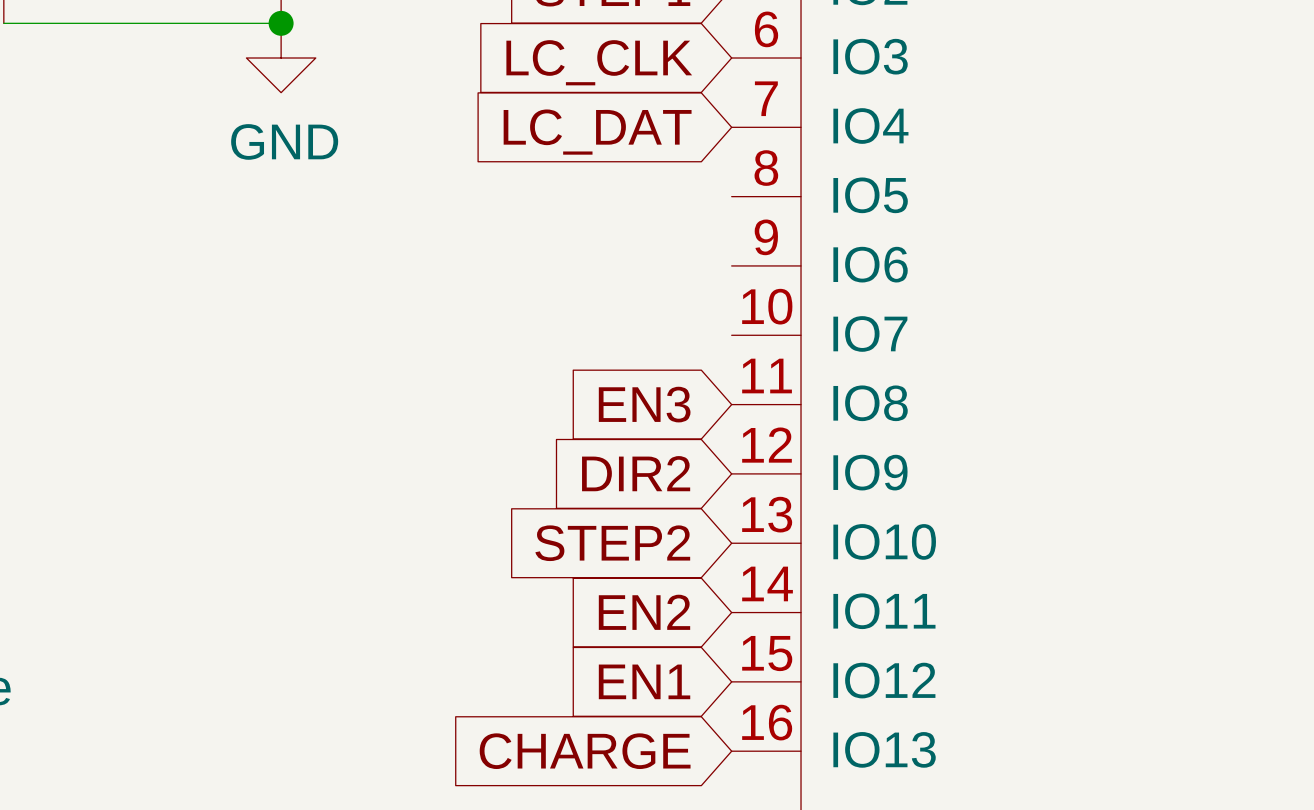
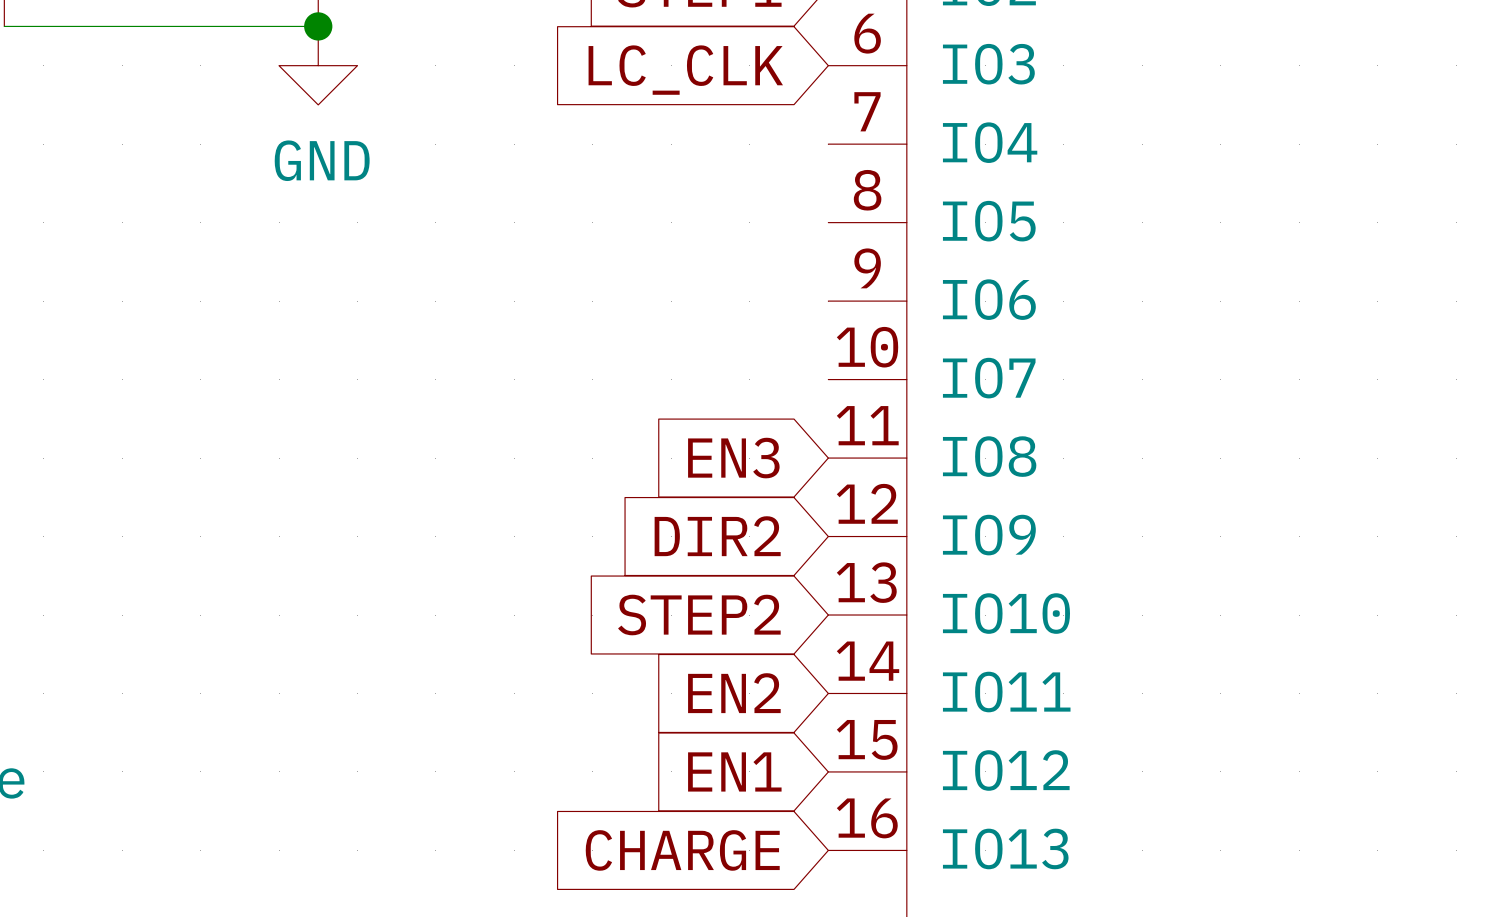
global label: LC_DAT (597, 132) -> none

